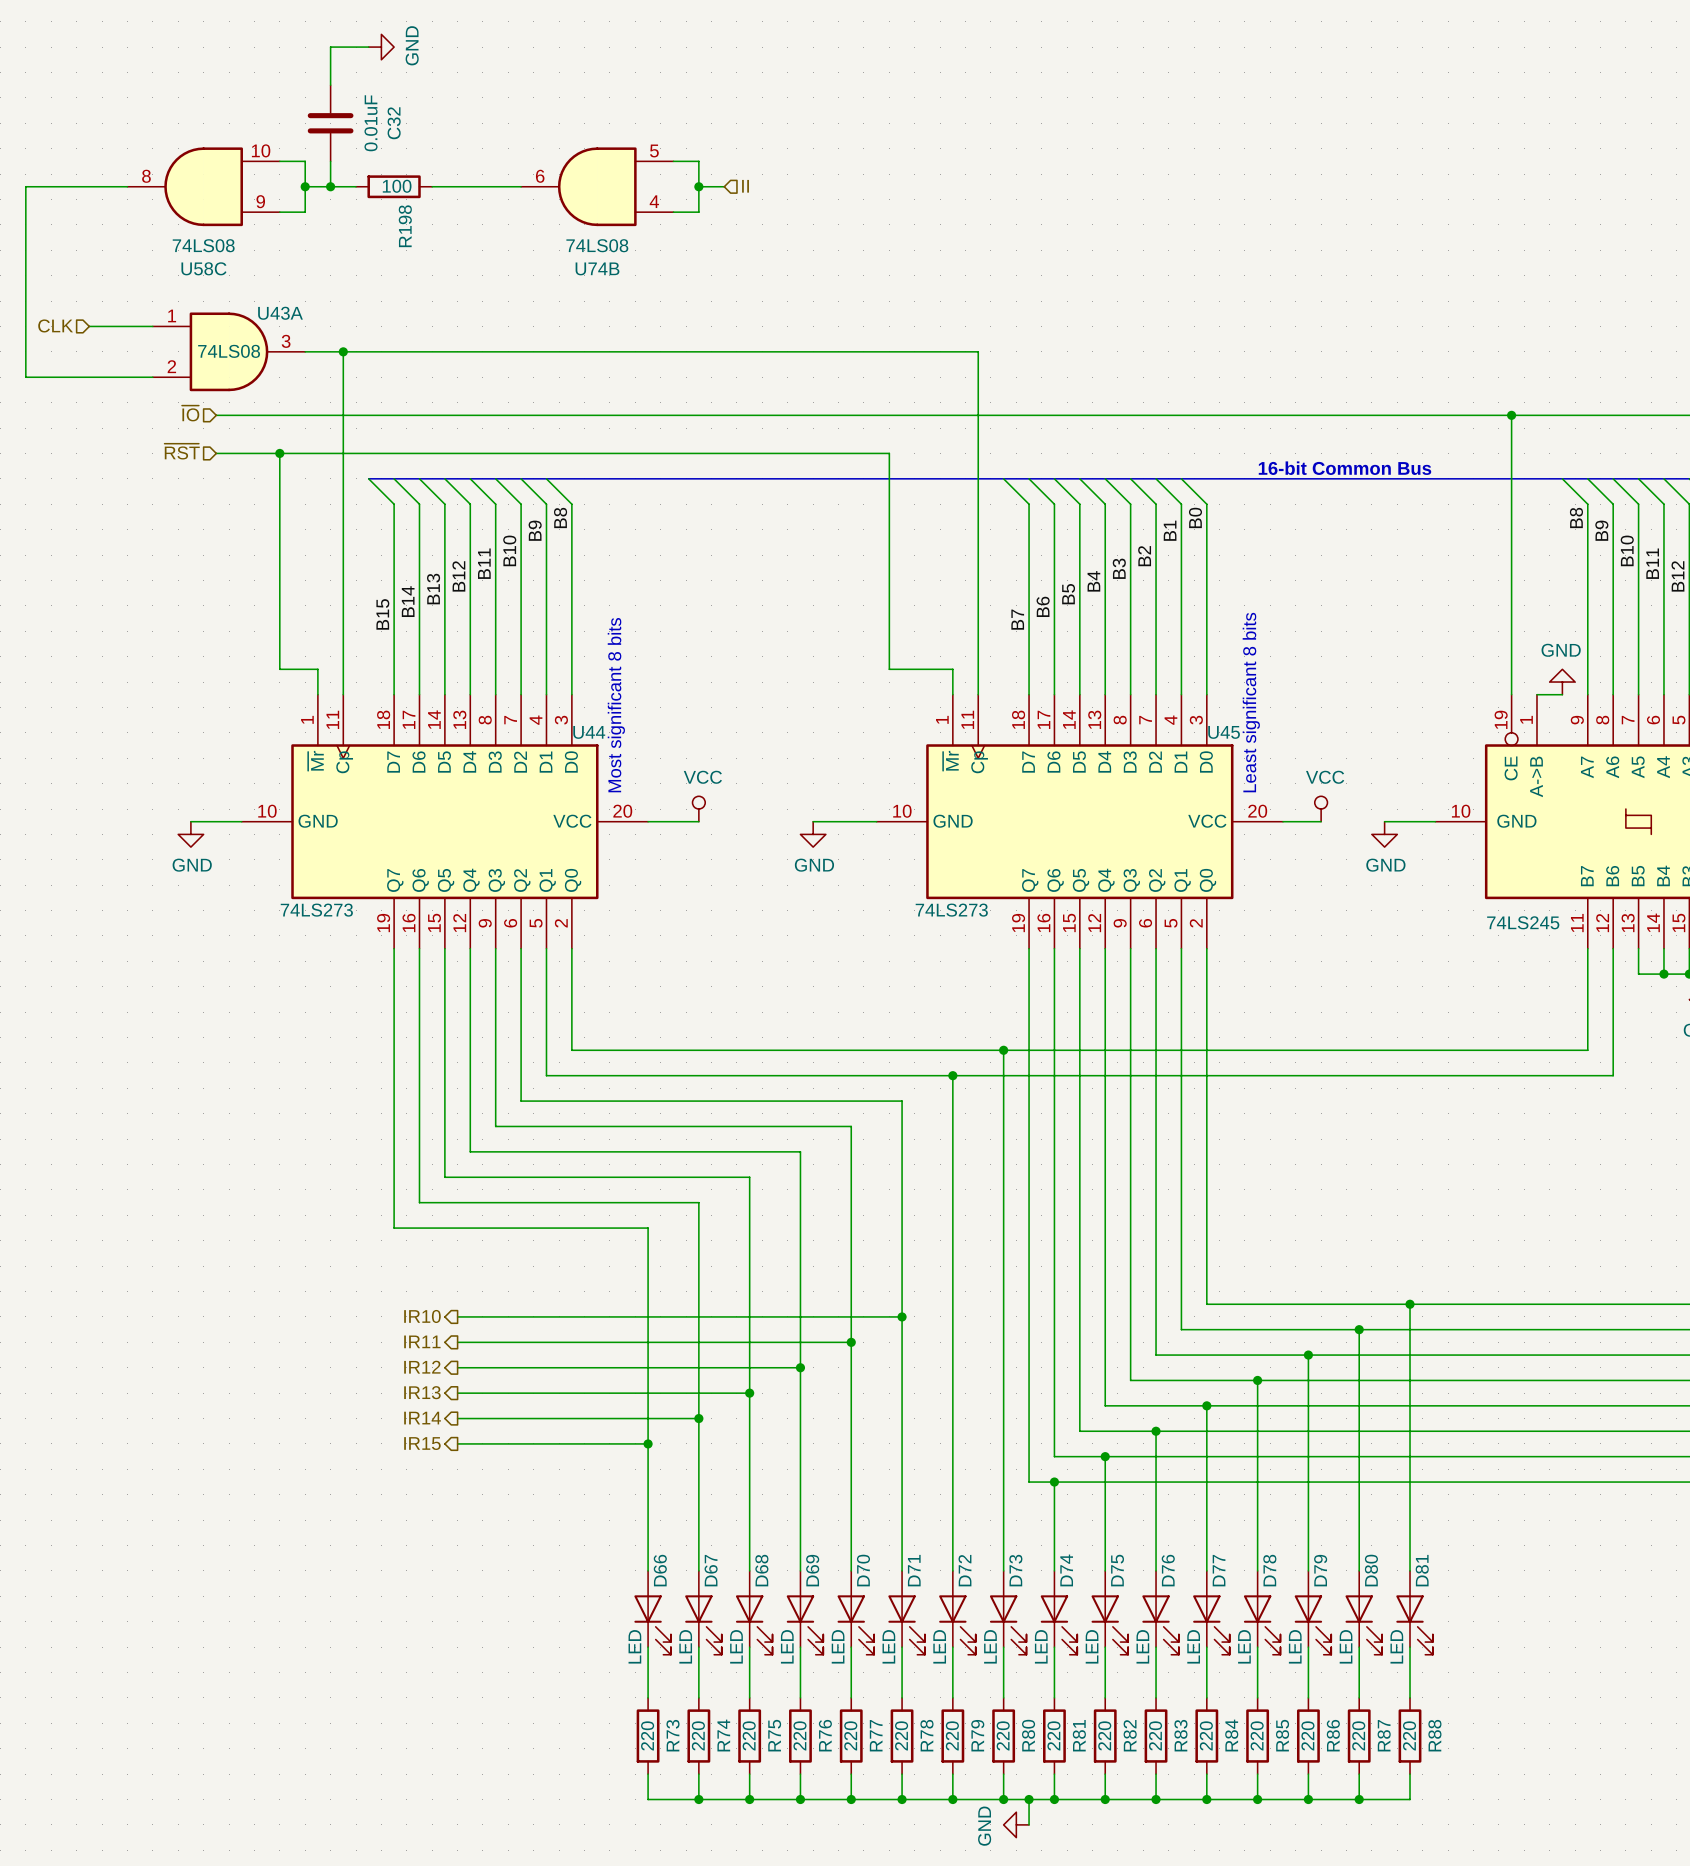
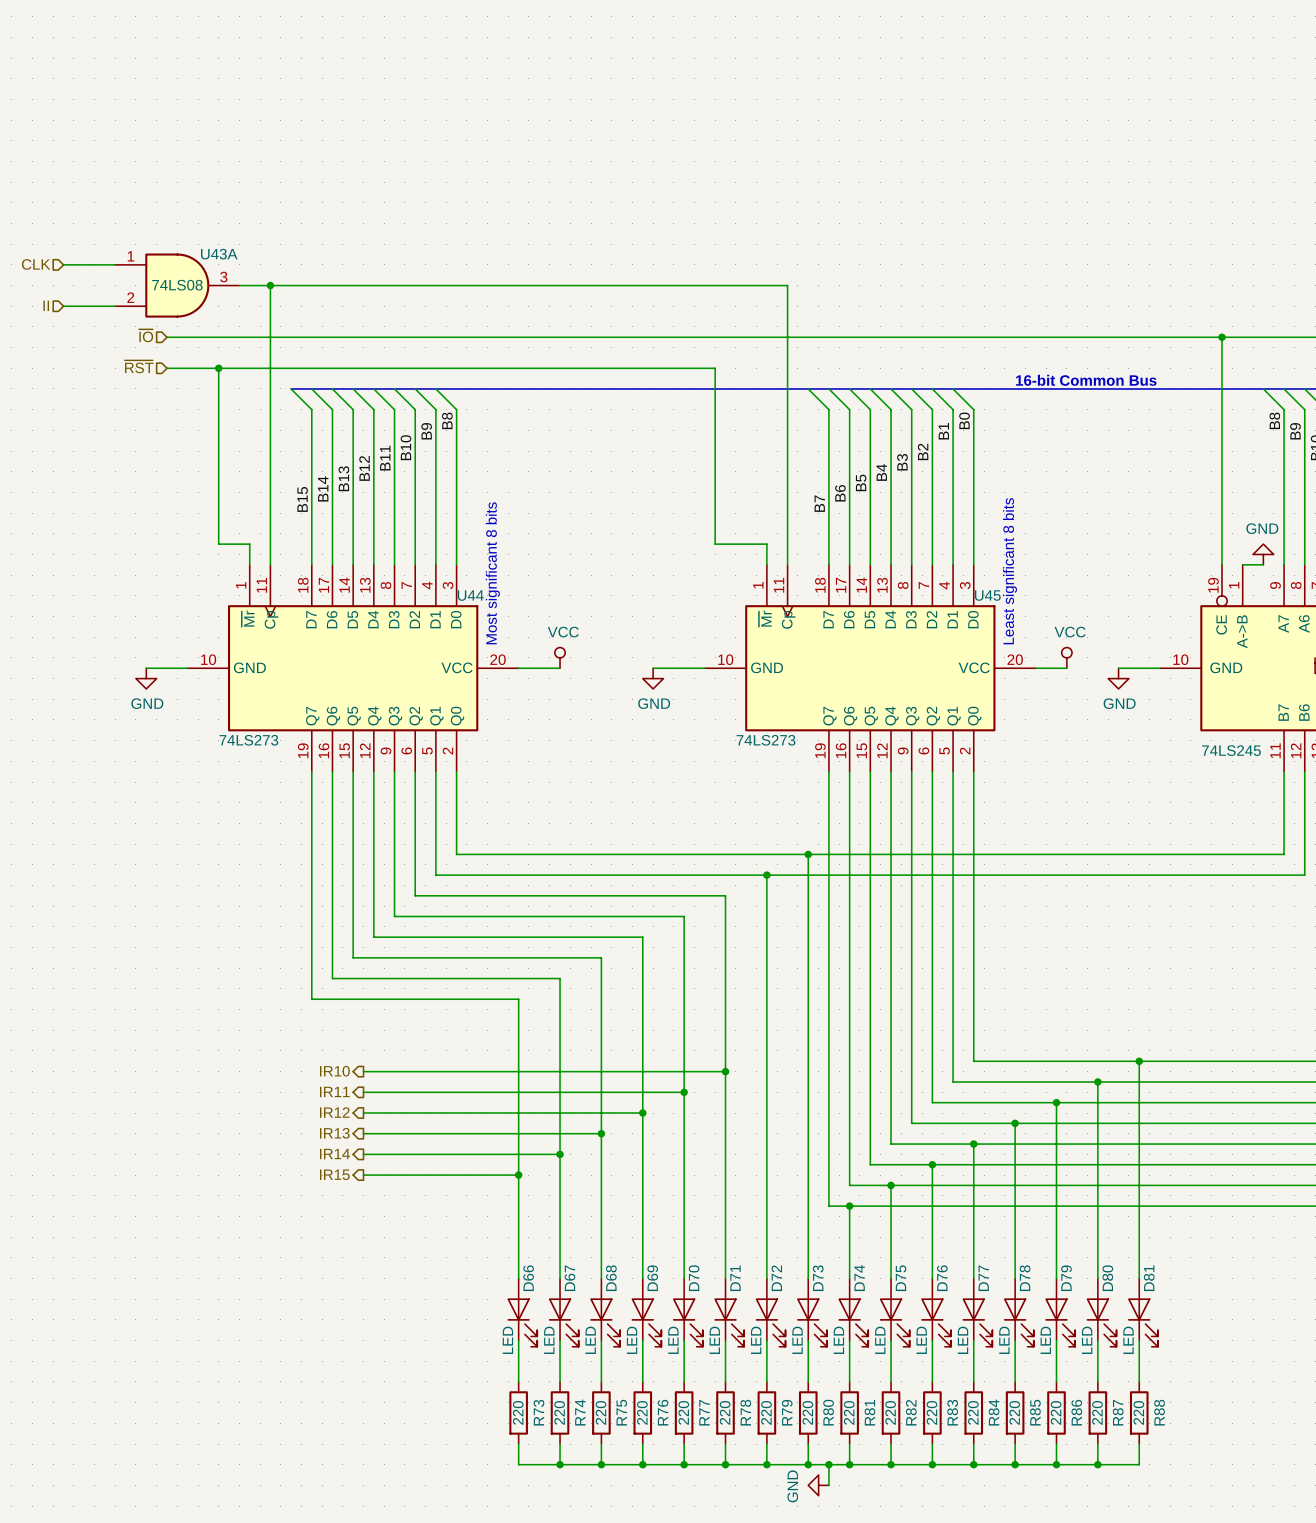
wire: (368, 47) (330, 47) (330, 85) -> none
power symbol: GND (381, 47) -> none
C32: 0.01uF (330, 123) -> none
wire: (279, 161) (305, 161) (305, 212) (279, 212) -> none
wire: (330, 161) (330, 186) -> none
wire: (673, 161) (698, 161) (698, 212) (673, 212) -> none
wire: (127, 186) (25, 186) (25, 377) (89, 377) -> none
U58C: 74LS08 (203, 186) -> none
wire: (305, 186) (356, 186) -> none
junction: (305, 186) -> none
junction: (330, 186) -> none
R198: 100 (394, 186) -> none
wire: (432, 186) (521, 186) -> none
U74B: 74LS08 (597, 186) -> none
wire: (698, 186) (724, 186) -> none
junction: (698, 186) -> none
hierarchical label: II (745, 186) -> none
hierarchical label: none -> II (46, 305)

